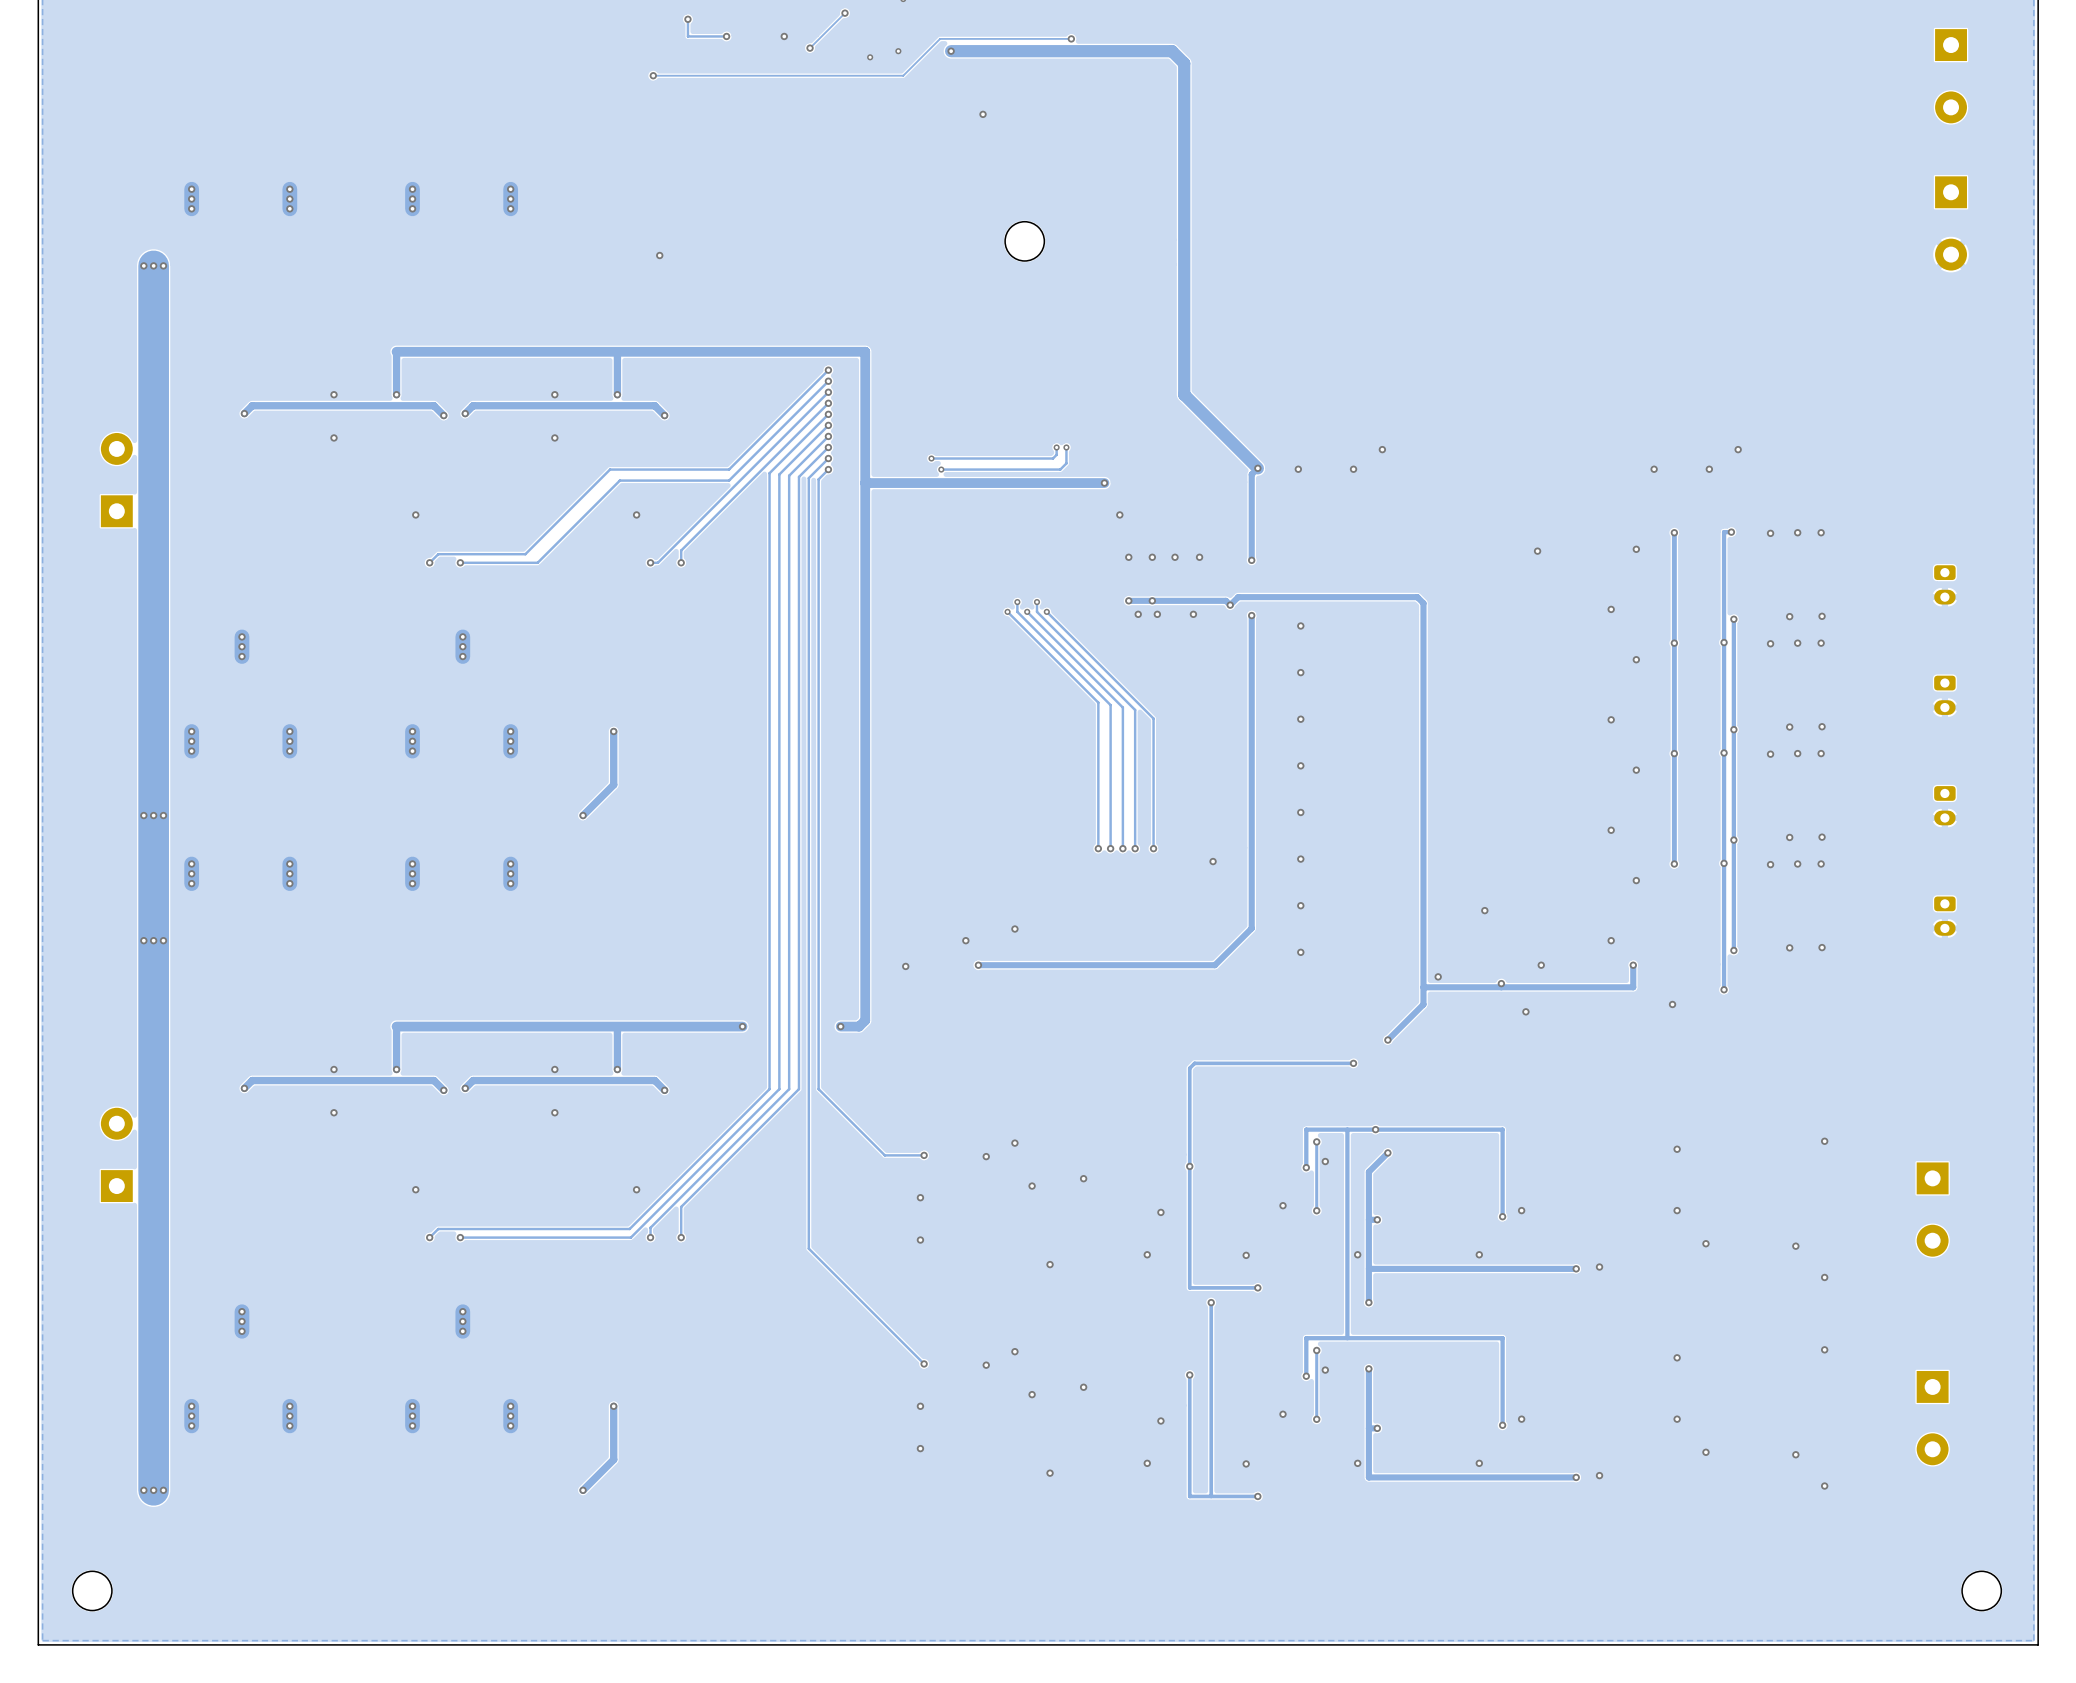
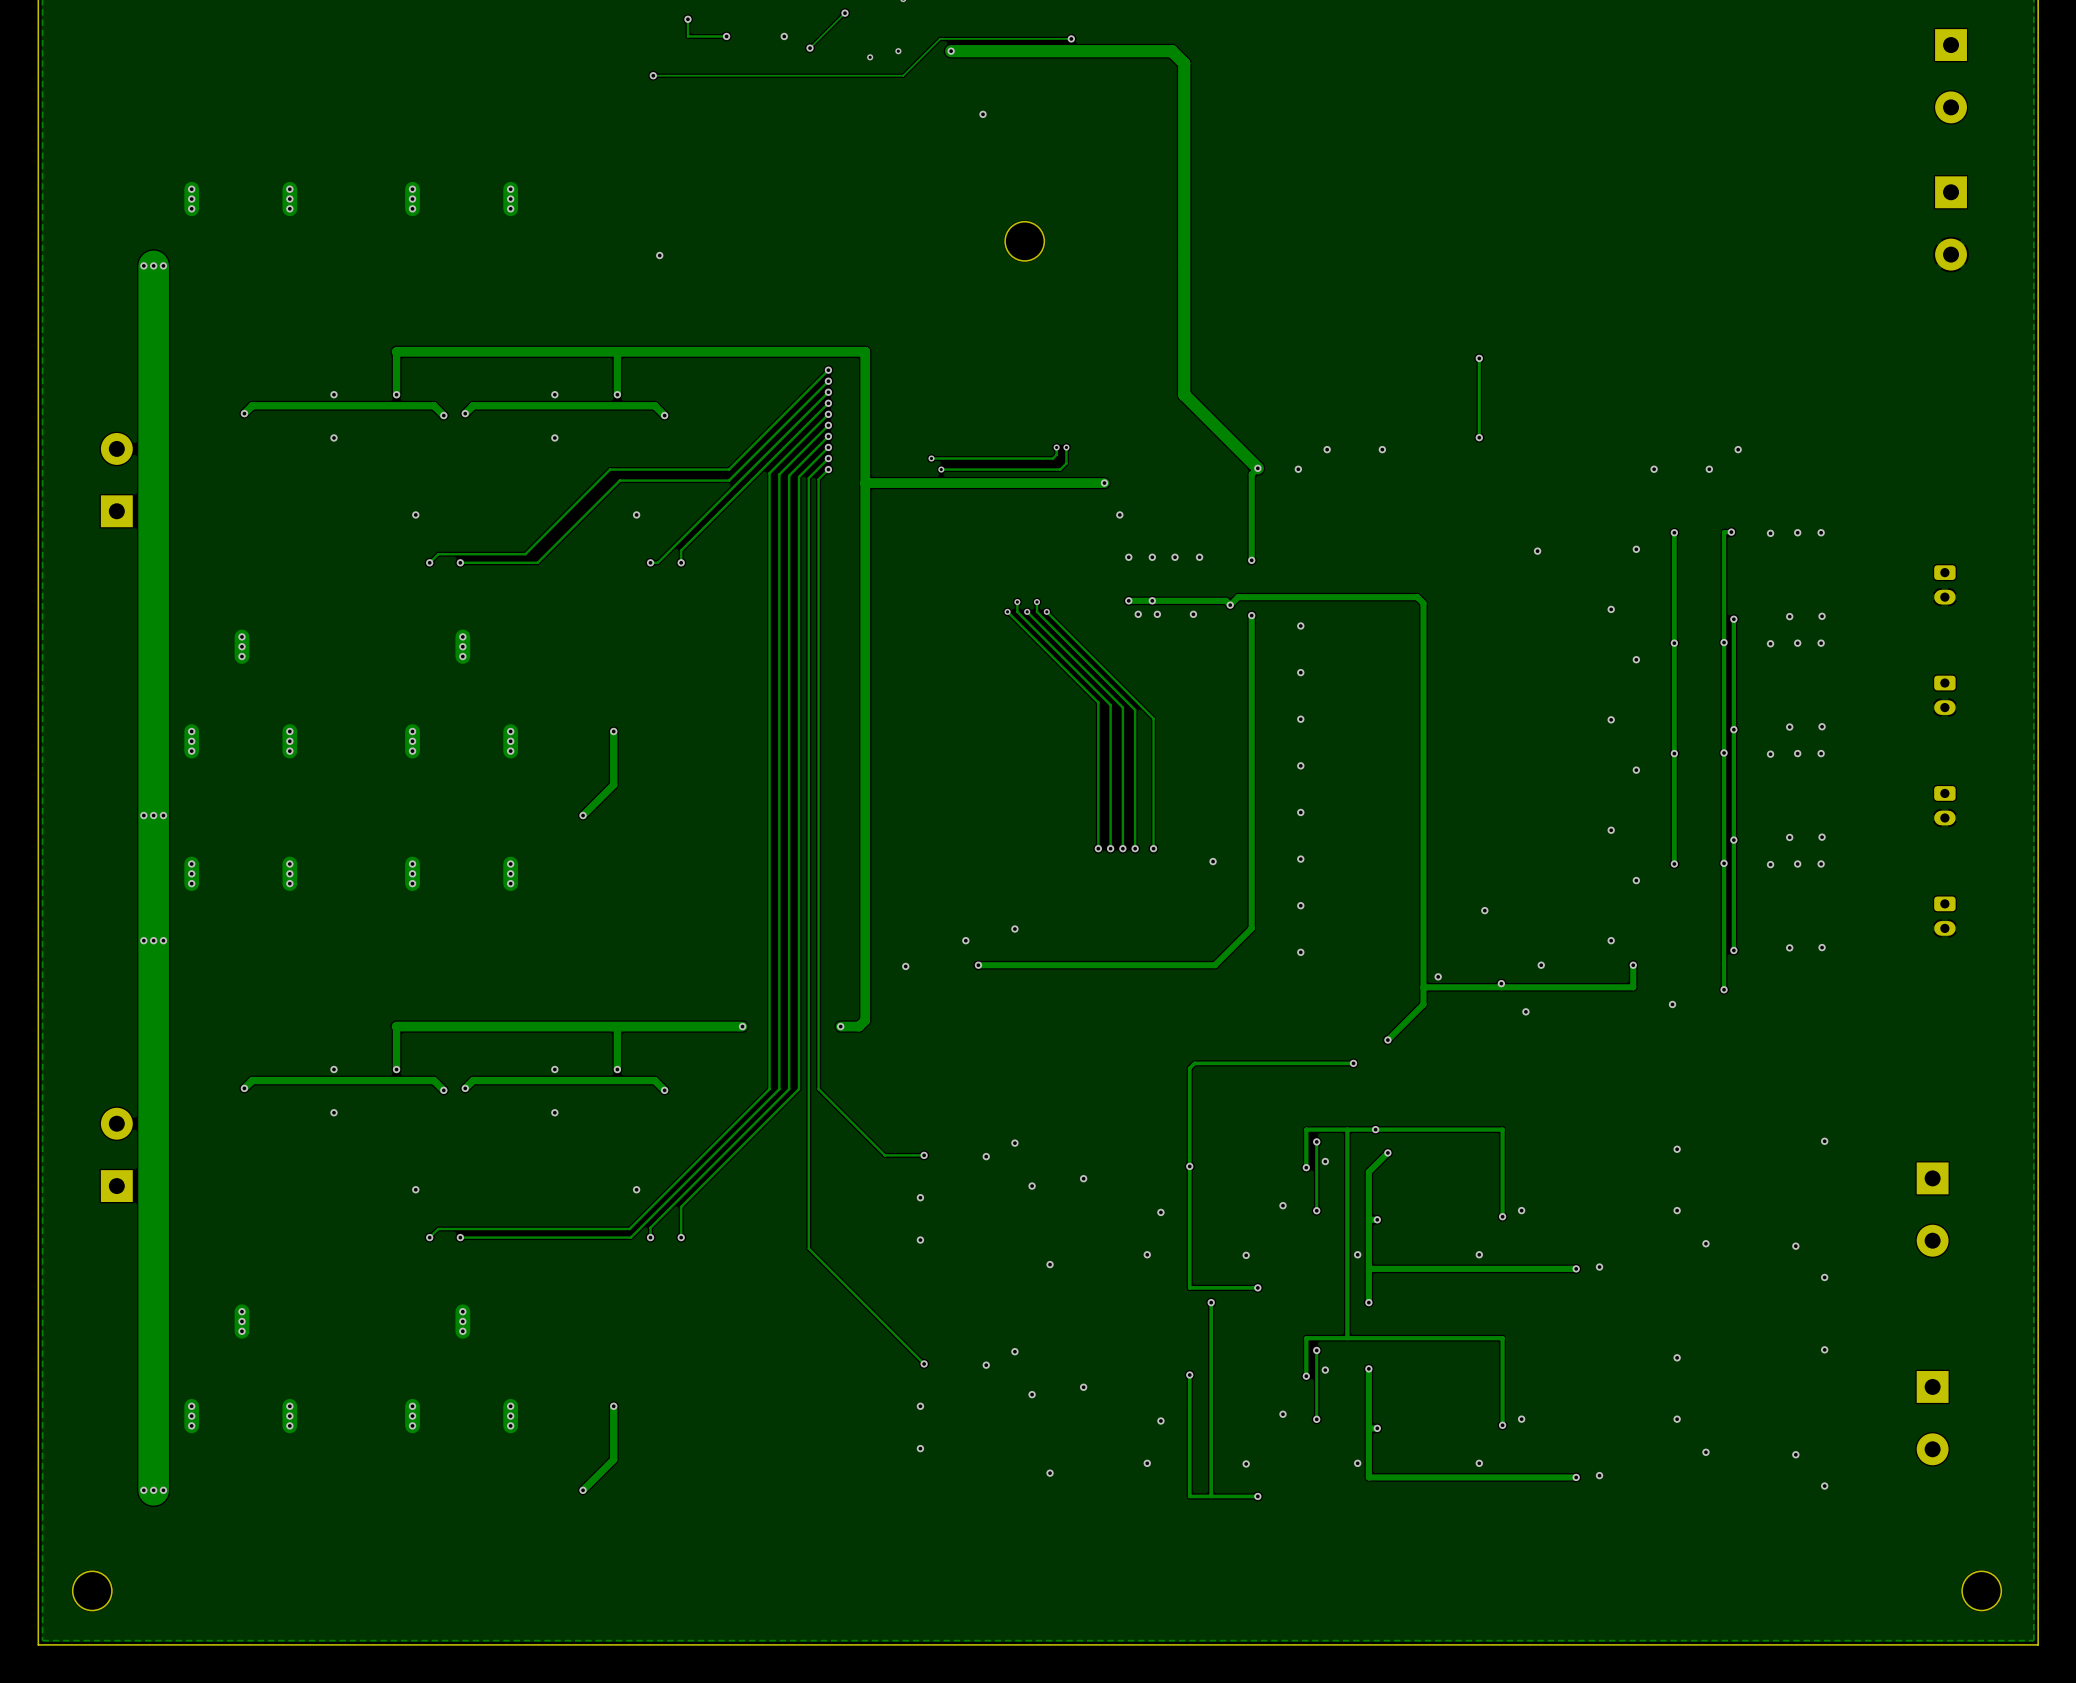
track: none -> (1479, 358) (1479, 437)
via: none -> (1479, 358)
via: none -> (1479, 437)
via position: (1353, 469) -> (1327, 449)

